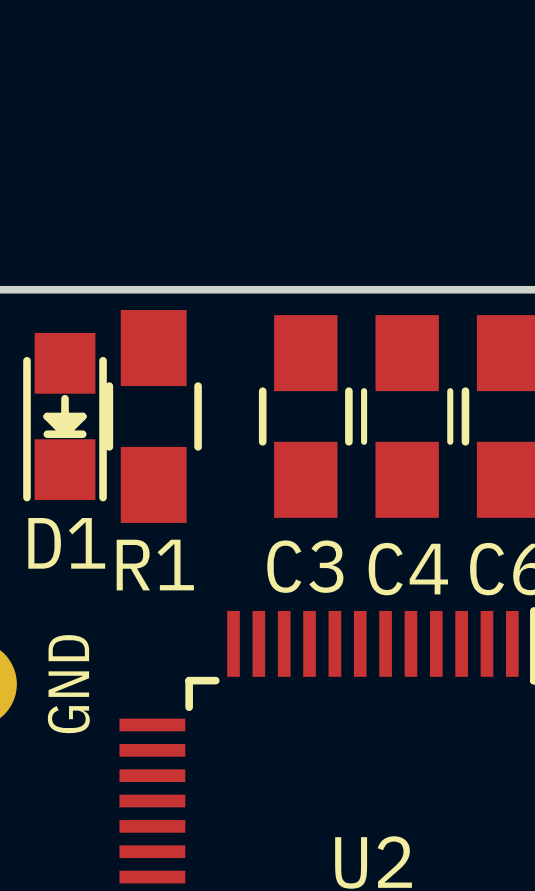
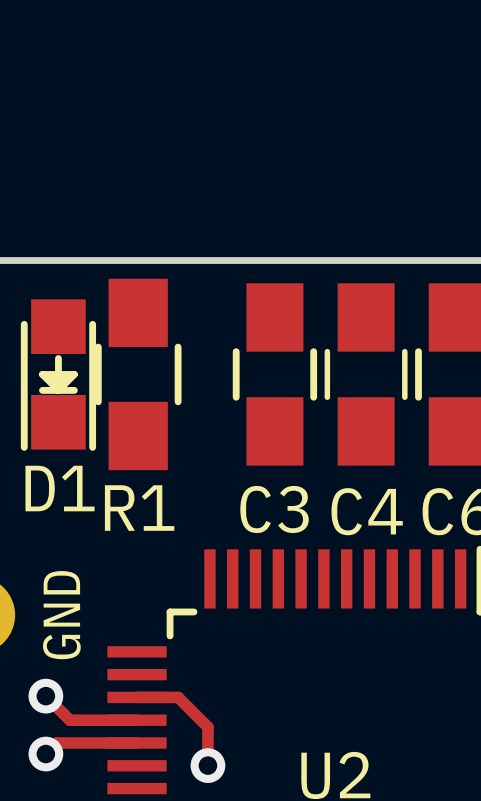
track: none -> (45, 696) (69, 720) (137, 720)
via: none -> (45, 696)
track: none -> (137, 697) (178, 697) (207, 727) (207, 765)
track: none -> (137, 743) (56, 743) (45, 754)
via: none -> (45, 754)
via: none -> (207, 765)

